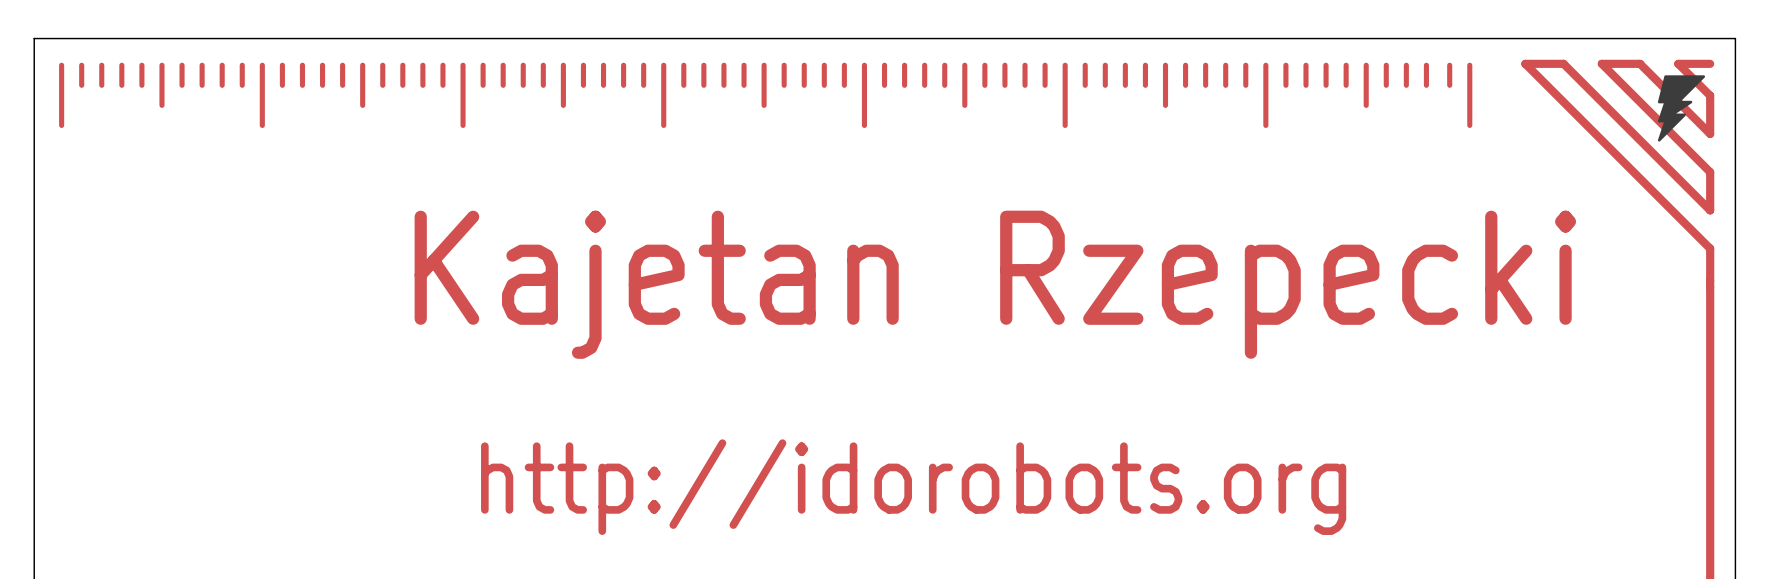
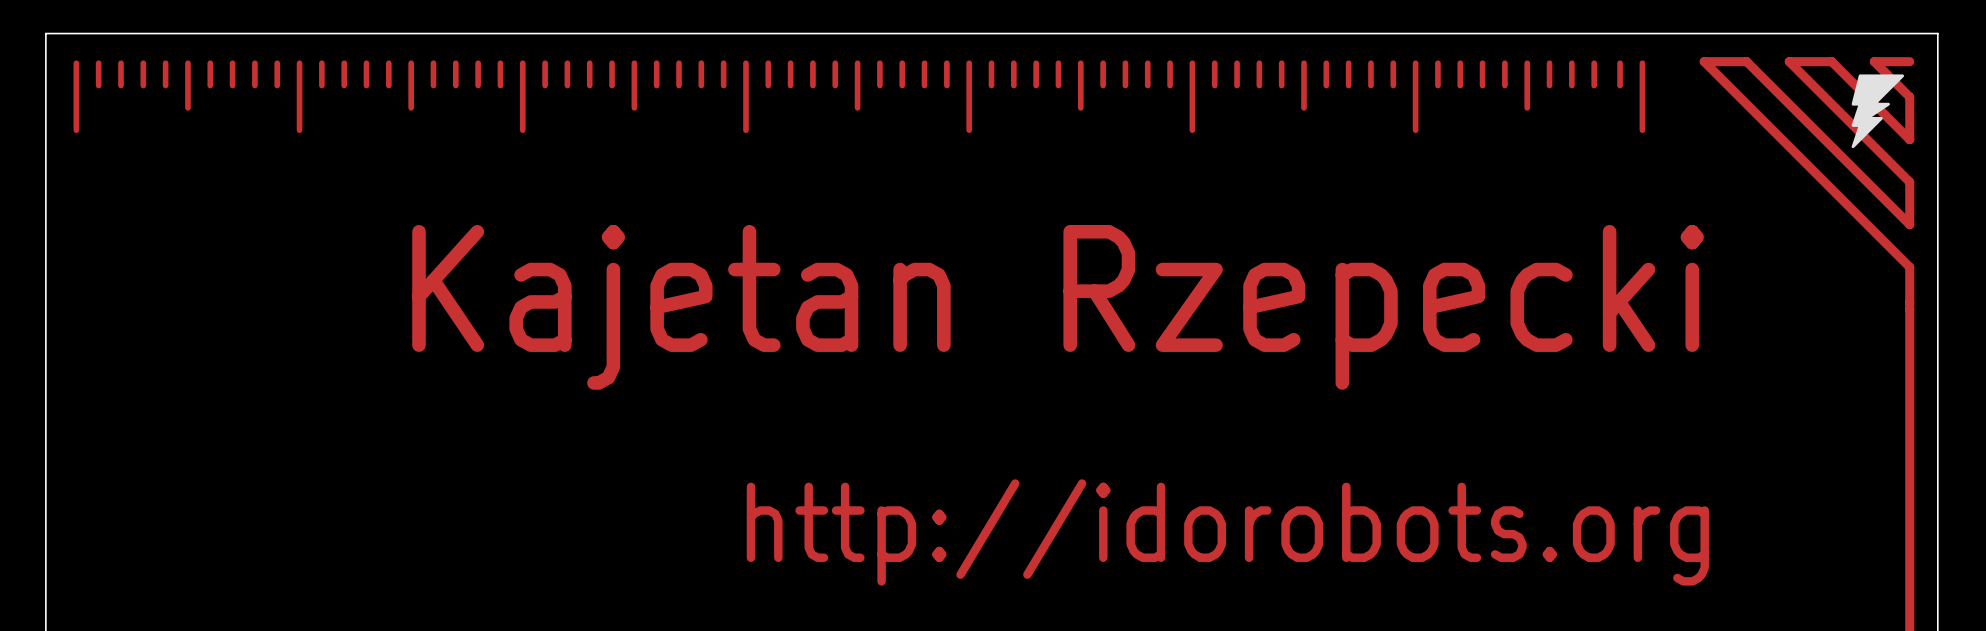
text position: Kajetan Rzepecki (995, 284) -> Kajetan Rzepecki (1058, 307)
text: http://idorobots.org (913, 487) -> none
text: none -> http://idorobots.org (1227, 532)

